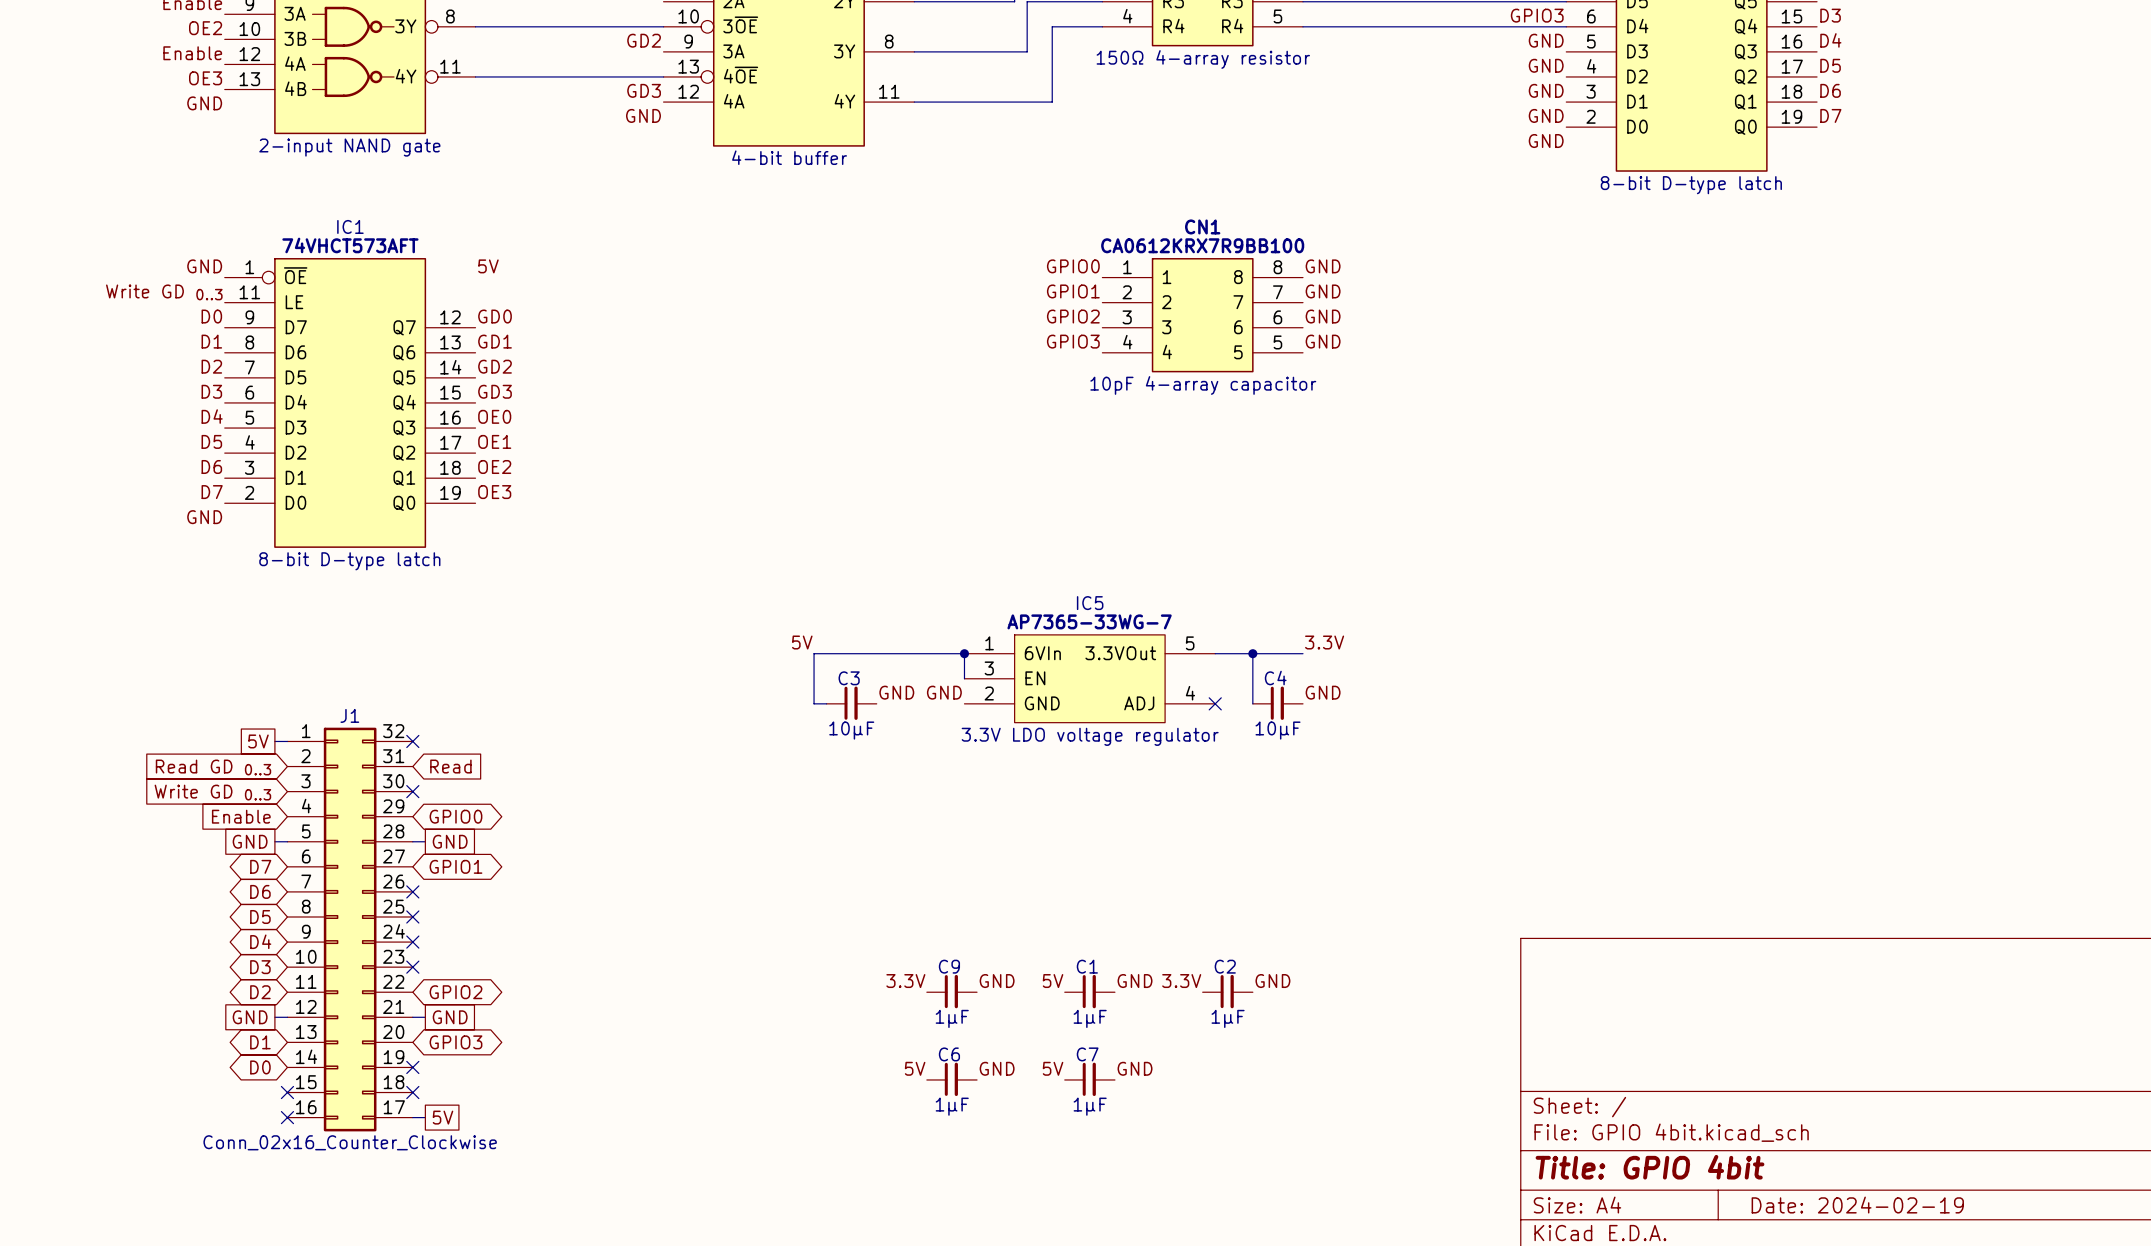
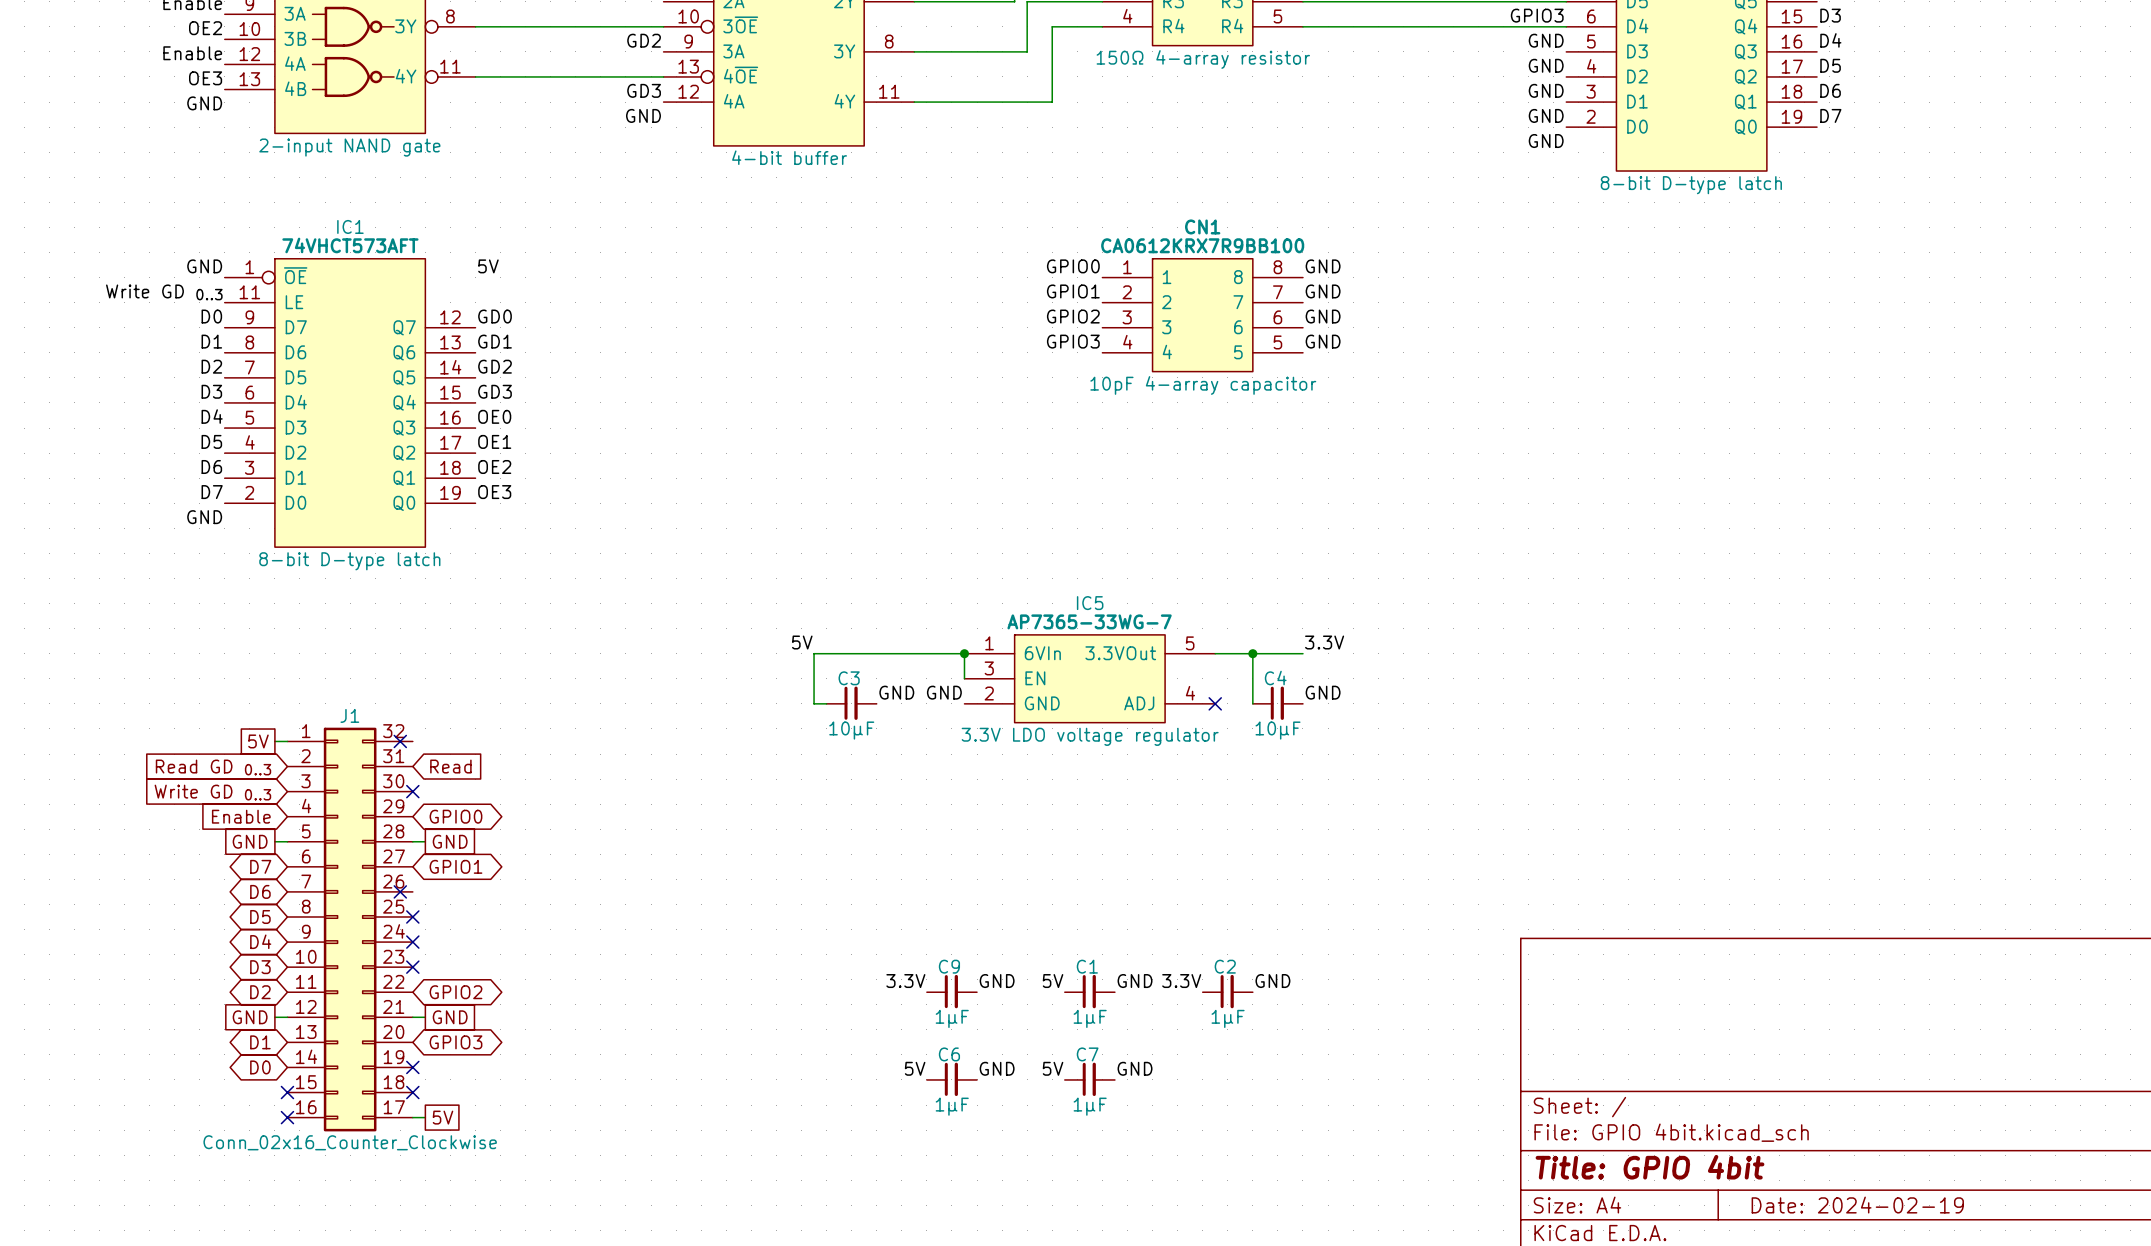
no-connect mark position: (412, 741) -> (400, 741)
no-connect mark position: (412, 891) -> (400, 891)

